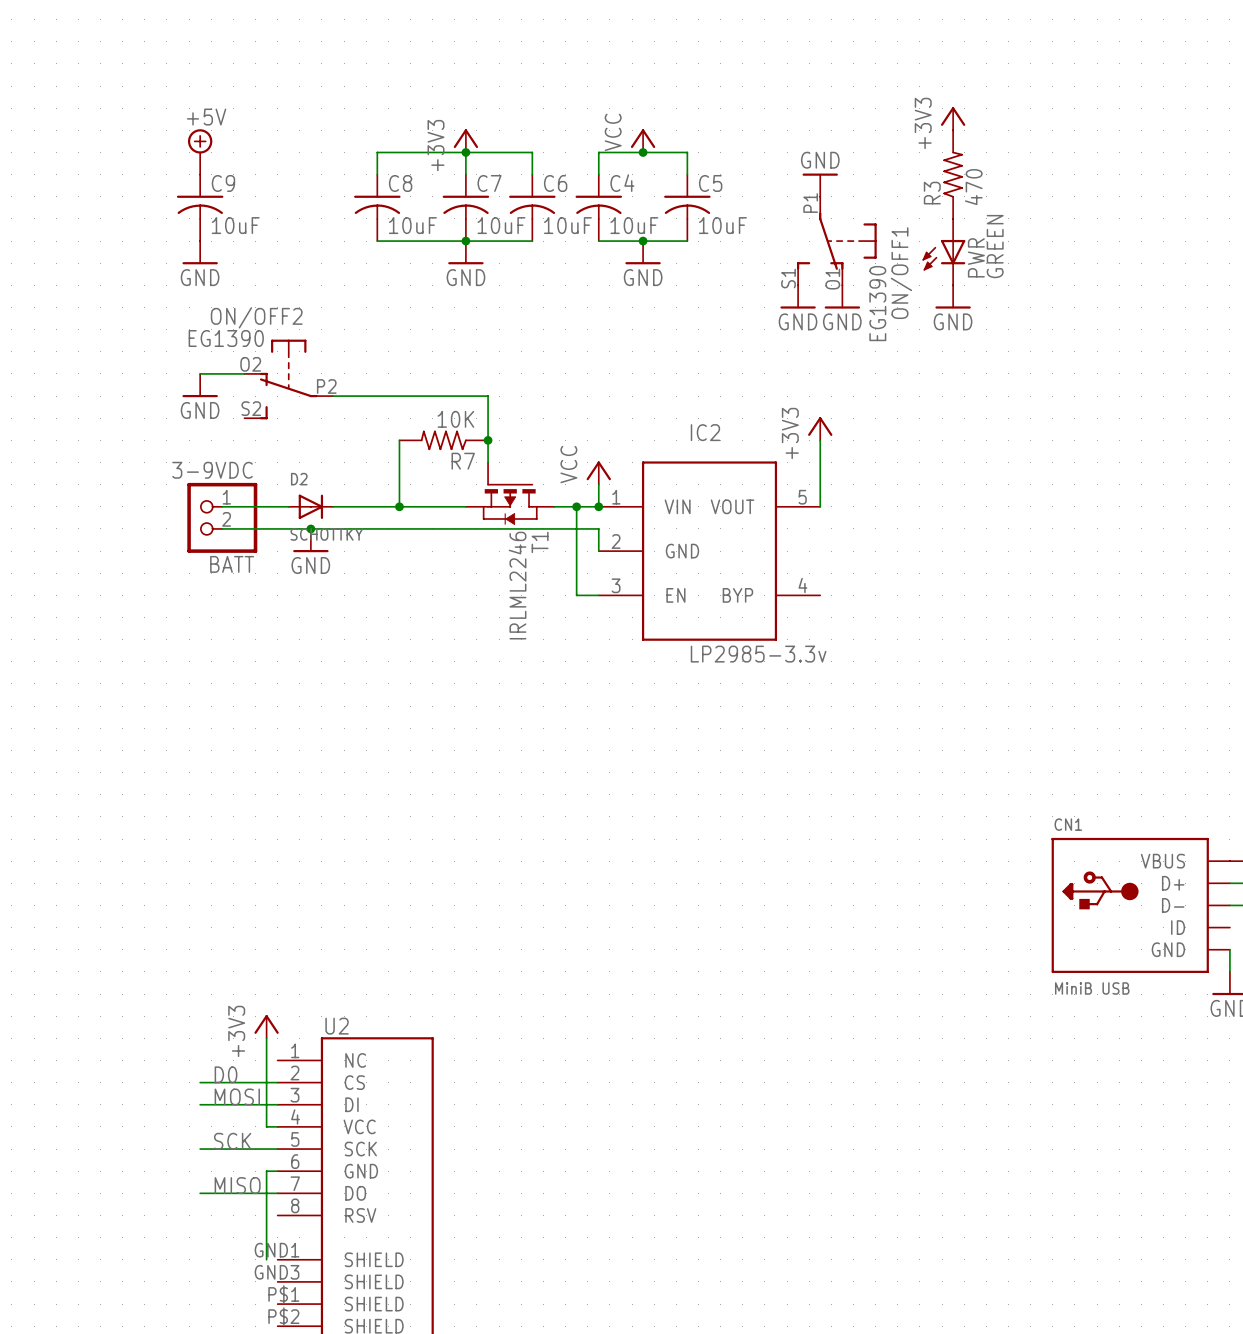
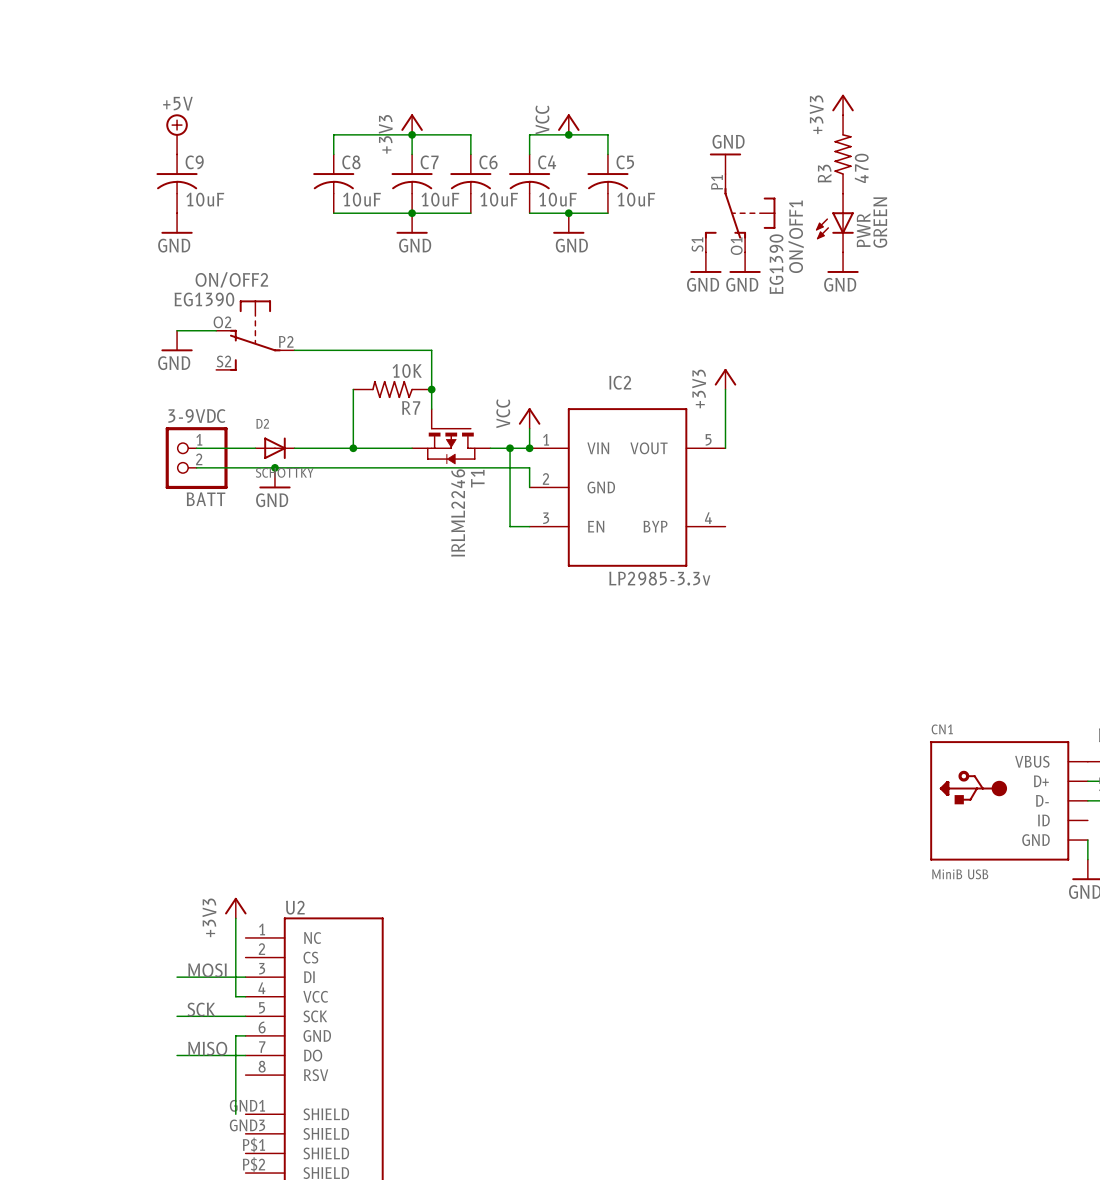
label: D0 (225, 1074) -> none
wire: (200, 1082) (277, 1082) -> none

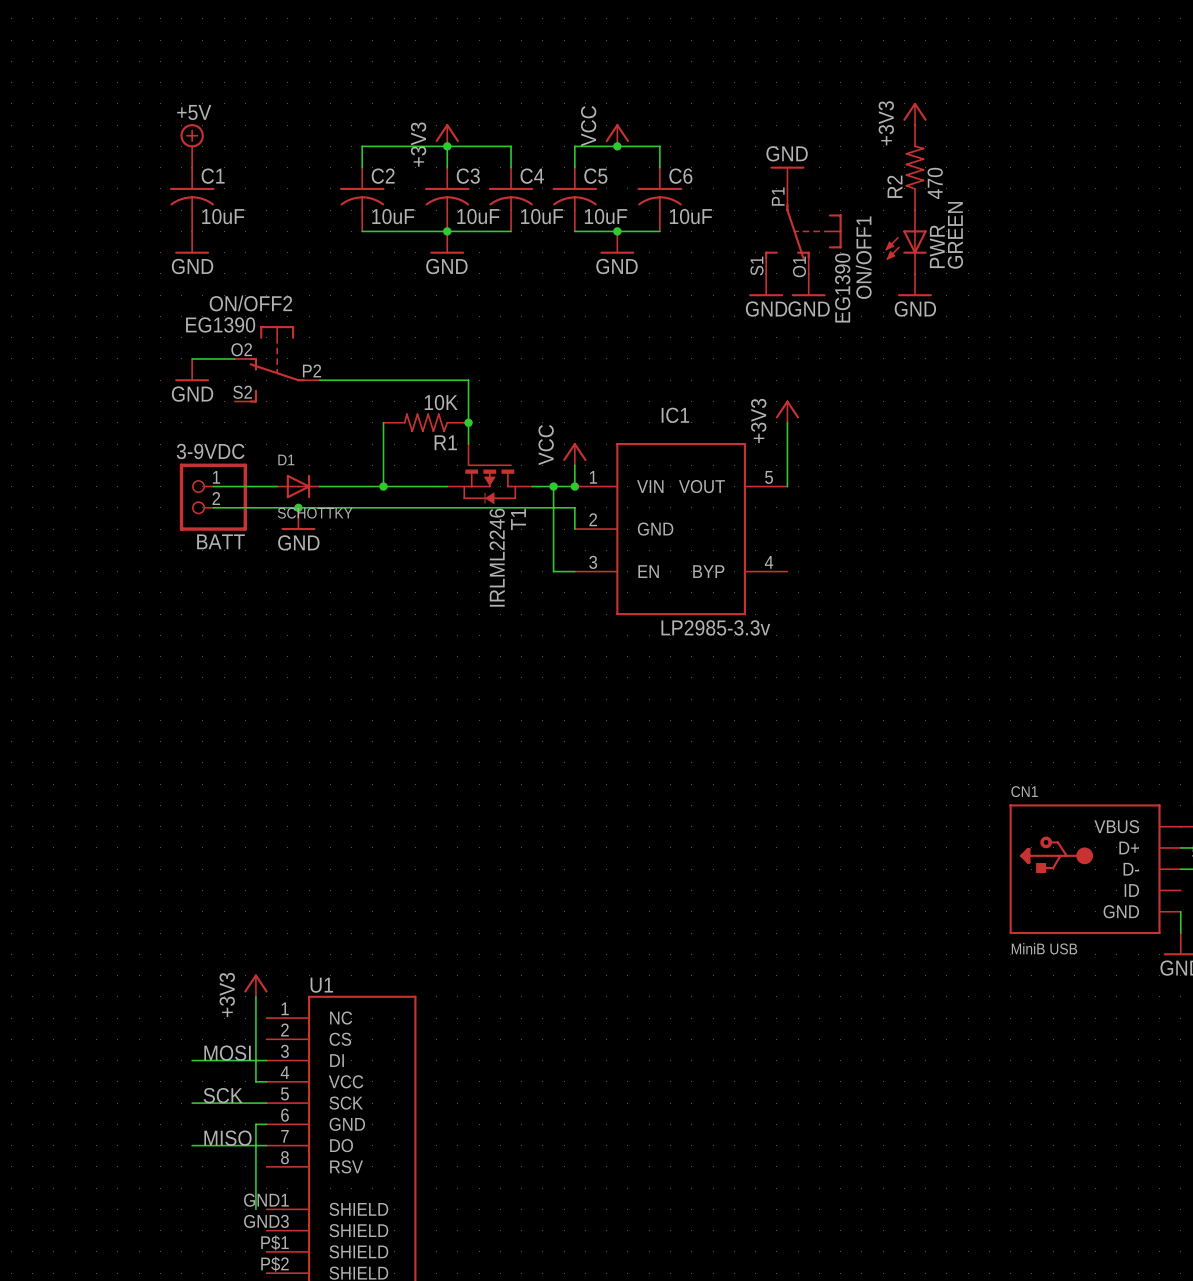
C9 name: C9 (194, 162) -> C1 (213, 176)
C8 name: C8 (351, 162) -> C2 (383, 176)
C7 name: C7 (429, 162) -> C3 (468, 176)
C6 name: C6 (488, 162) -> C4 (532, 176)
C4 name: C4 (547, 162) -> C5 (595, 176)
C5 name: C5 (625, 162) -> C6 (680, 176)
R3 name: R3 (824, 173) -> R2 (894, 186)
IC2 name: IC2 (620, 382) -> IC1 (675, 415)
R7 name: R7 (411, 407) -> R1 (445, 442)
D2 name: D2 (262, 423) -> D1 (286, 459)
U2 name: U2 (295, 907) -> U1 (321, 985)

